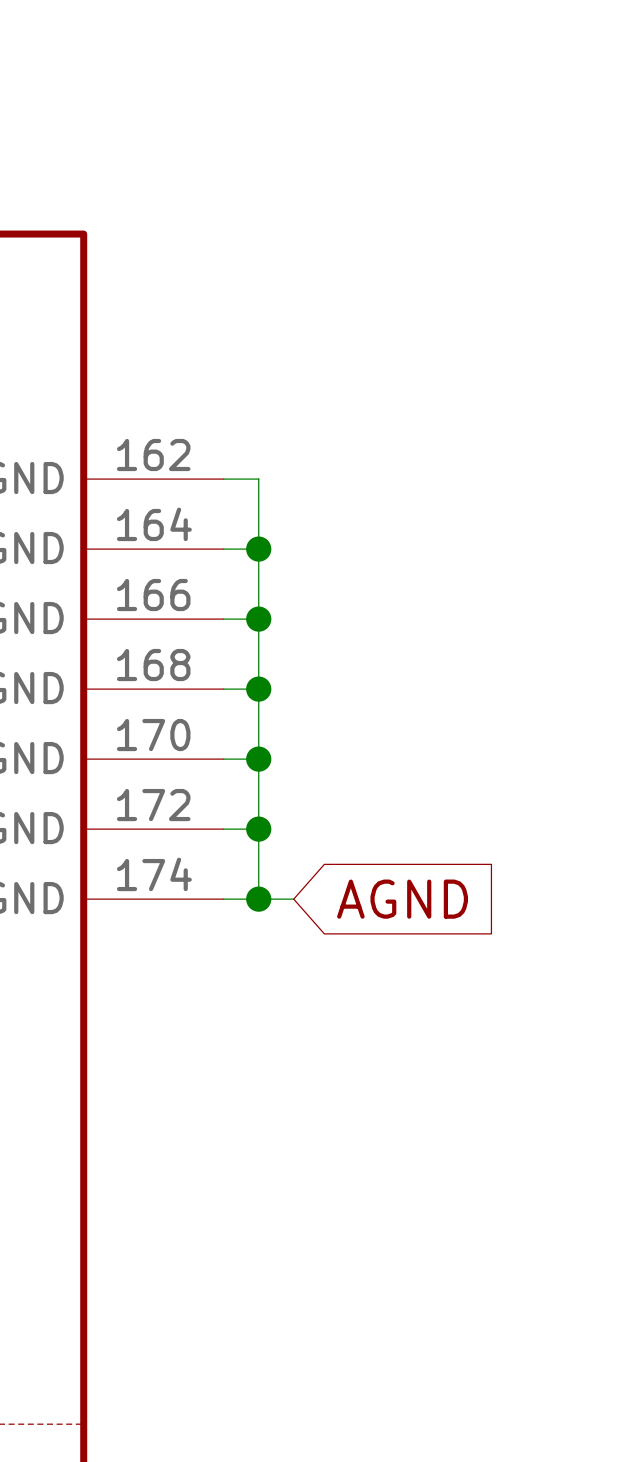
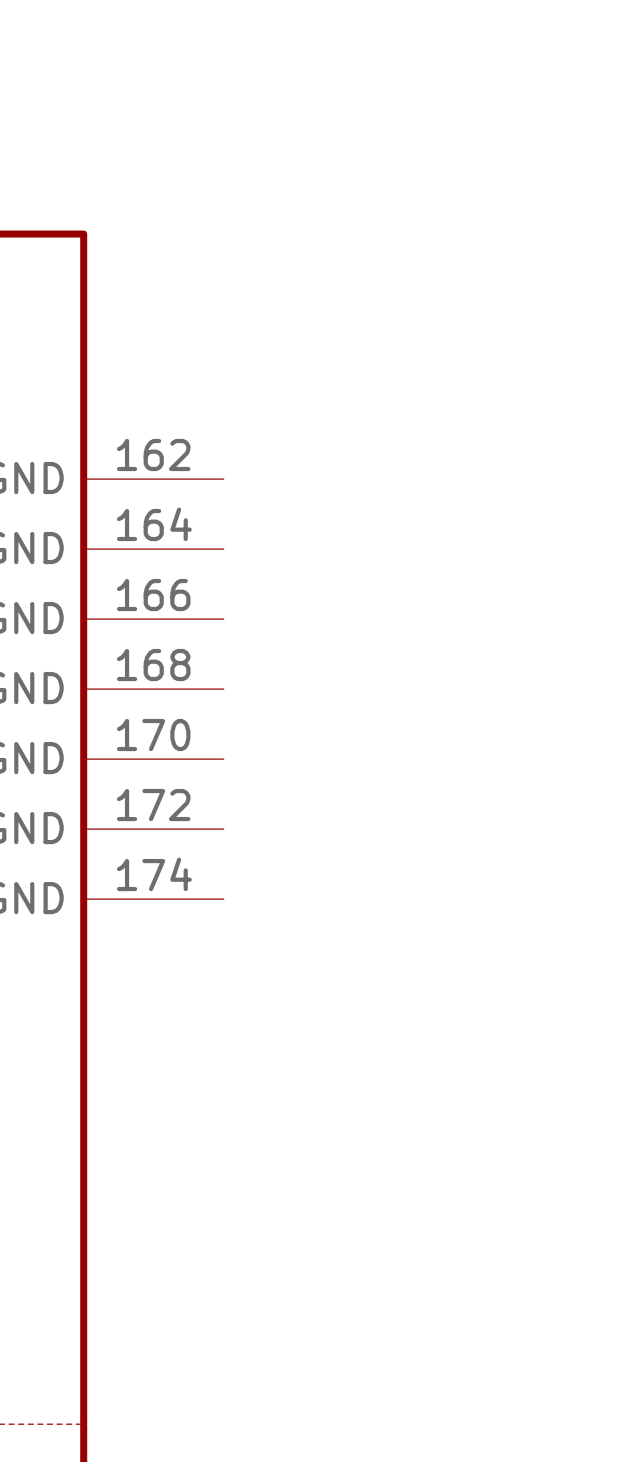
wire: (223, 479) (258, 479) (258, 899) -> none
wire: (223, 549) (258, 549) -> none
junction: (258, 549) -> none
wire: (223, 619) (258, 619) -> none
junction: (258, 619) -> none
wire: (223, 689) (258, 689) -> none
junction: (258, 689) -> none
wire: (223, 759) (258, 759) -> none
junction: (258, 759) -> none
wire: (223, 829) (258, 829) -> none
junction: (258, 829) -> none
wire: (223, 899) (293, 899) -> none
junction: (258, 899) -> none
global label: AGND (402, 899) -> none

